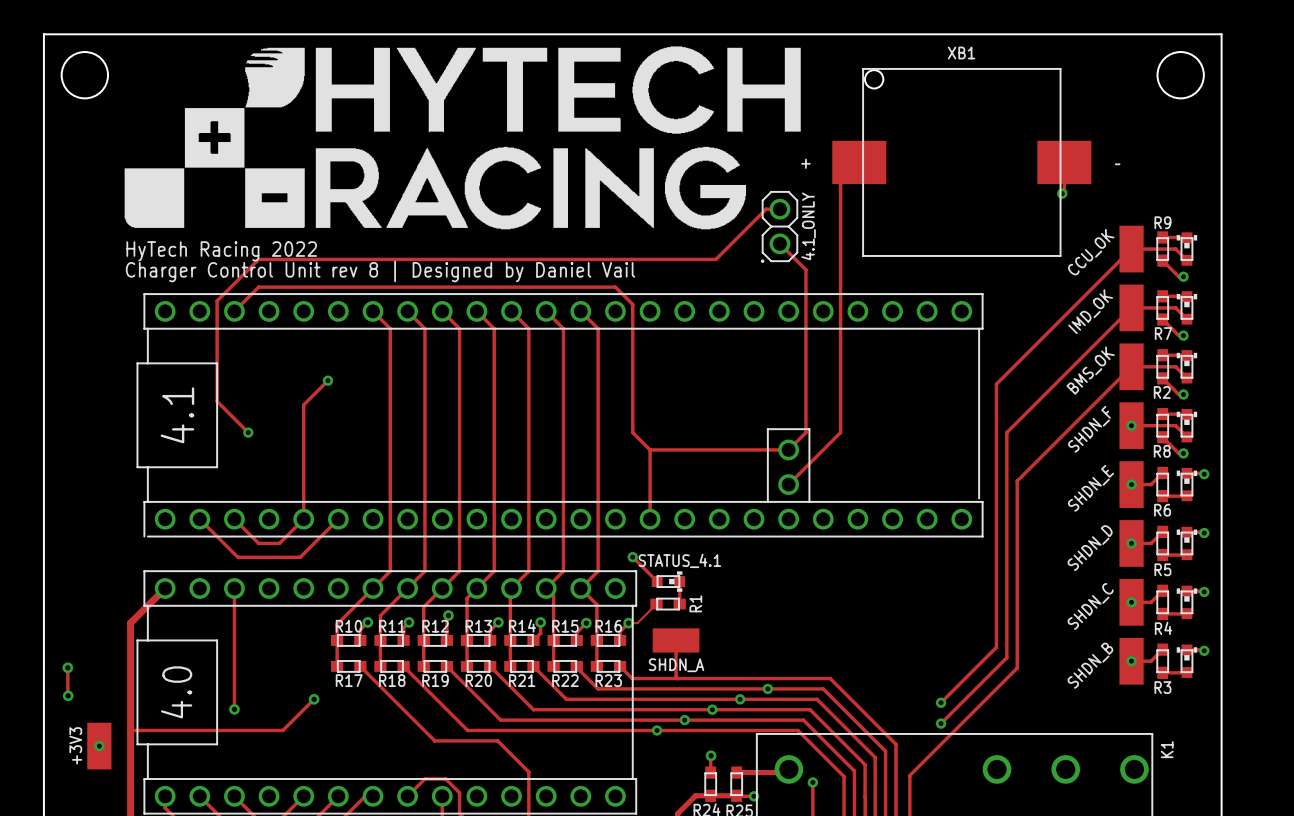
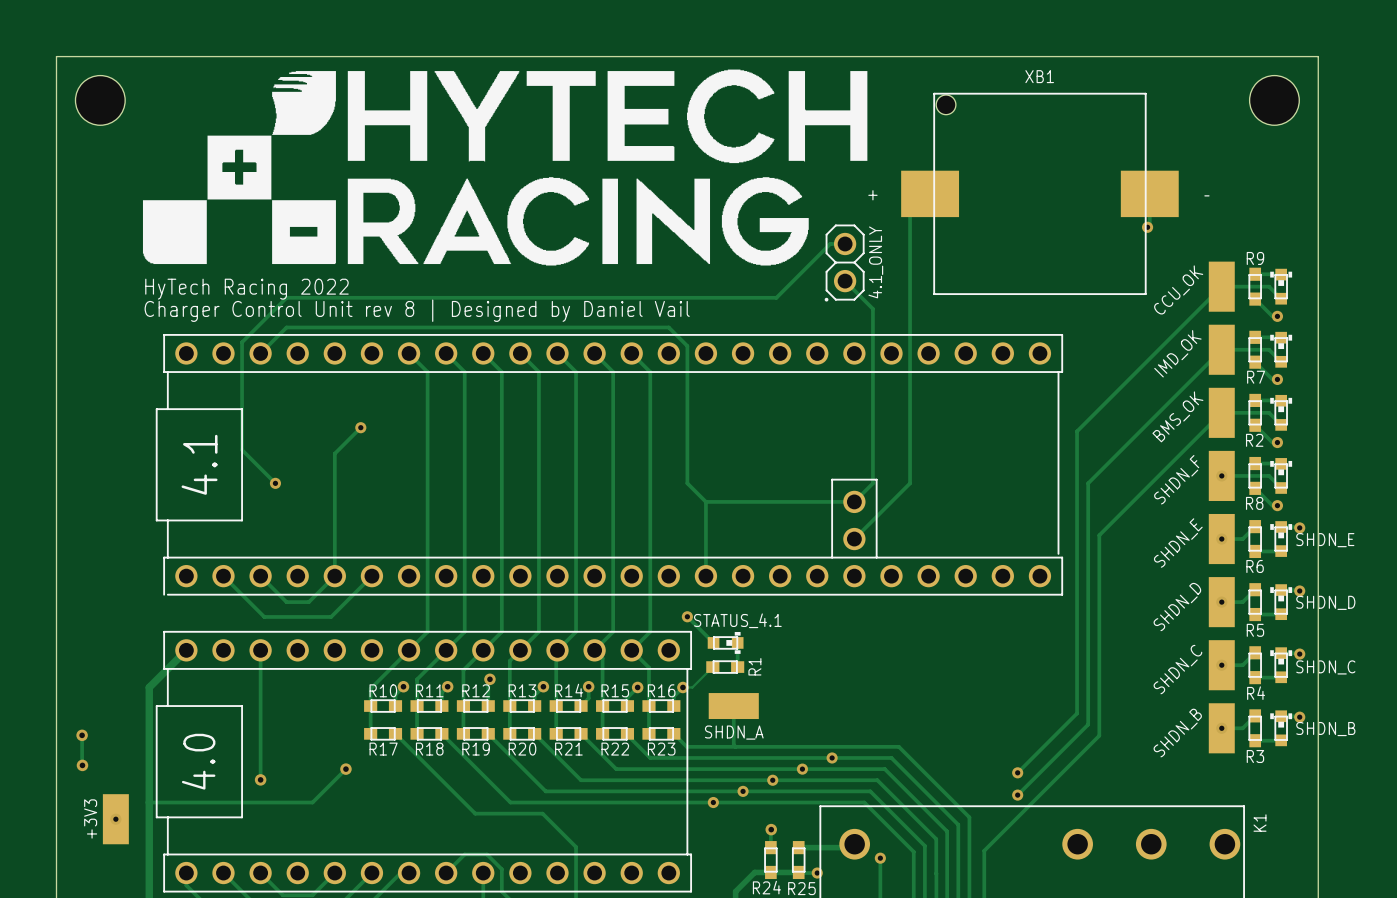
SHDN_E name: none -> SHDN_E (1325, 540)
SHDN_D name: none -> SHDN_D (1325, 602)
SHDN_C name: none -> SHDN_C (1325, 667)
SHDN_B name: none -> SHDN_B (1325, 729)

